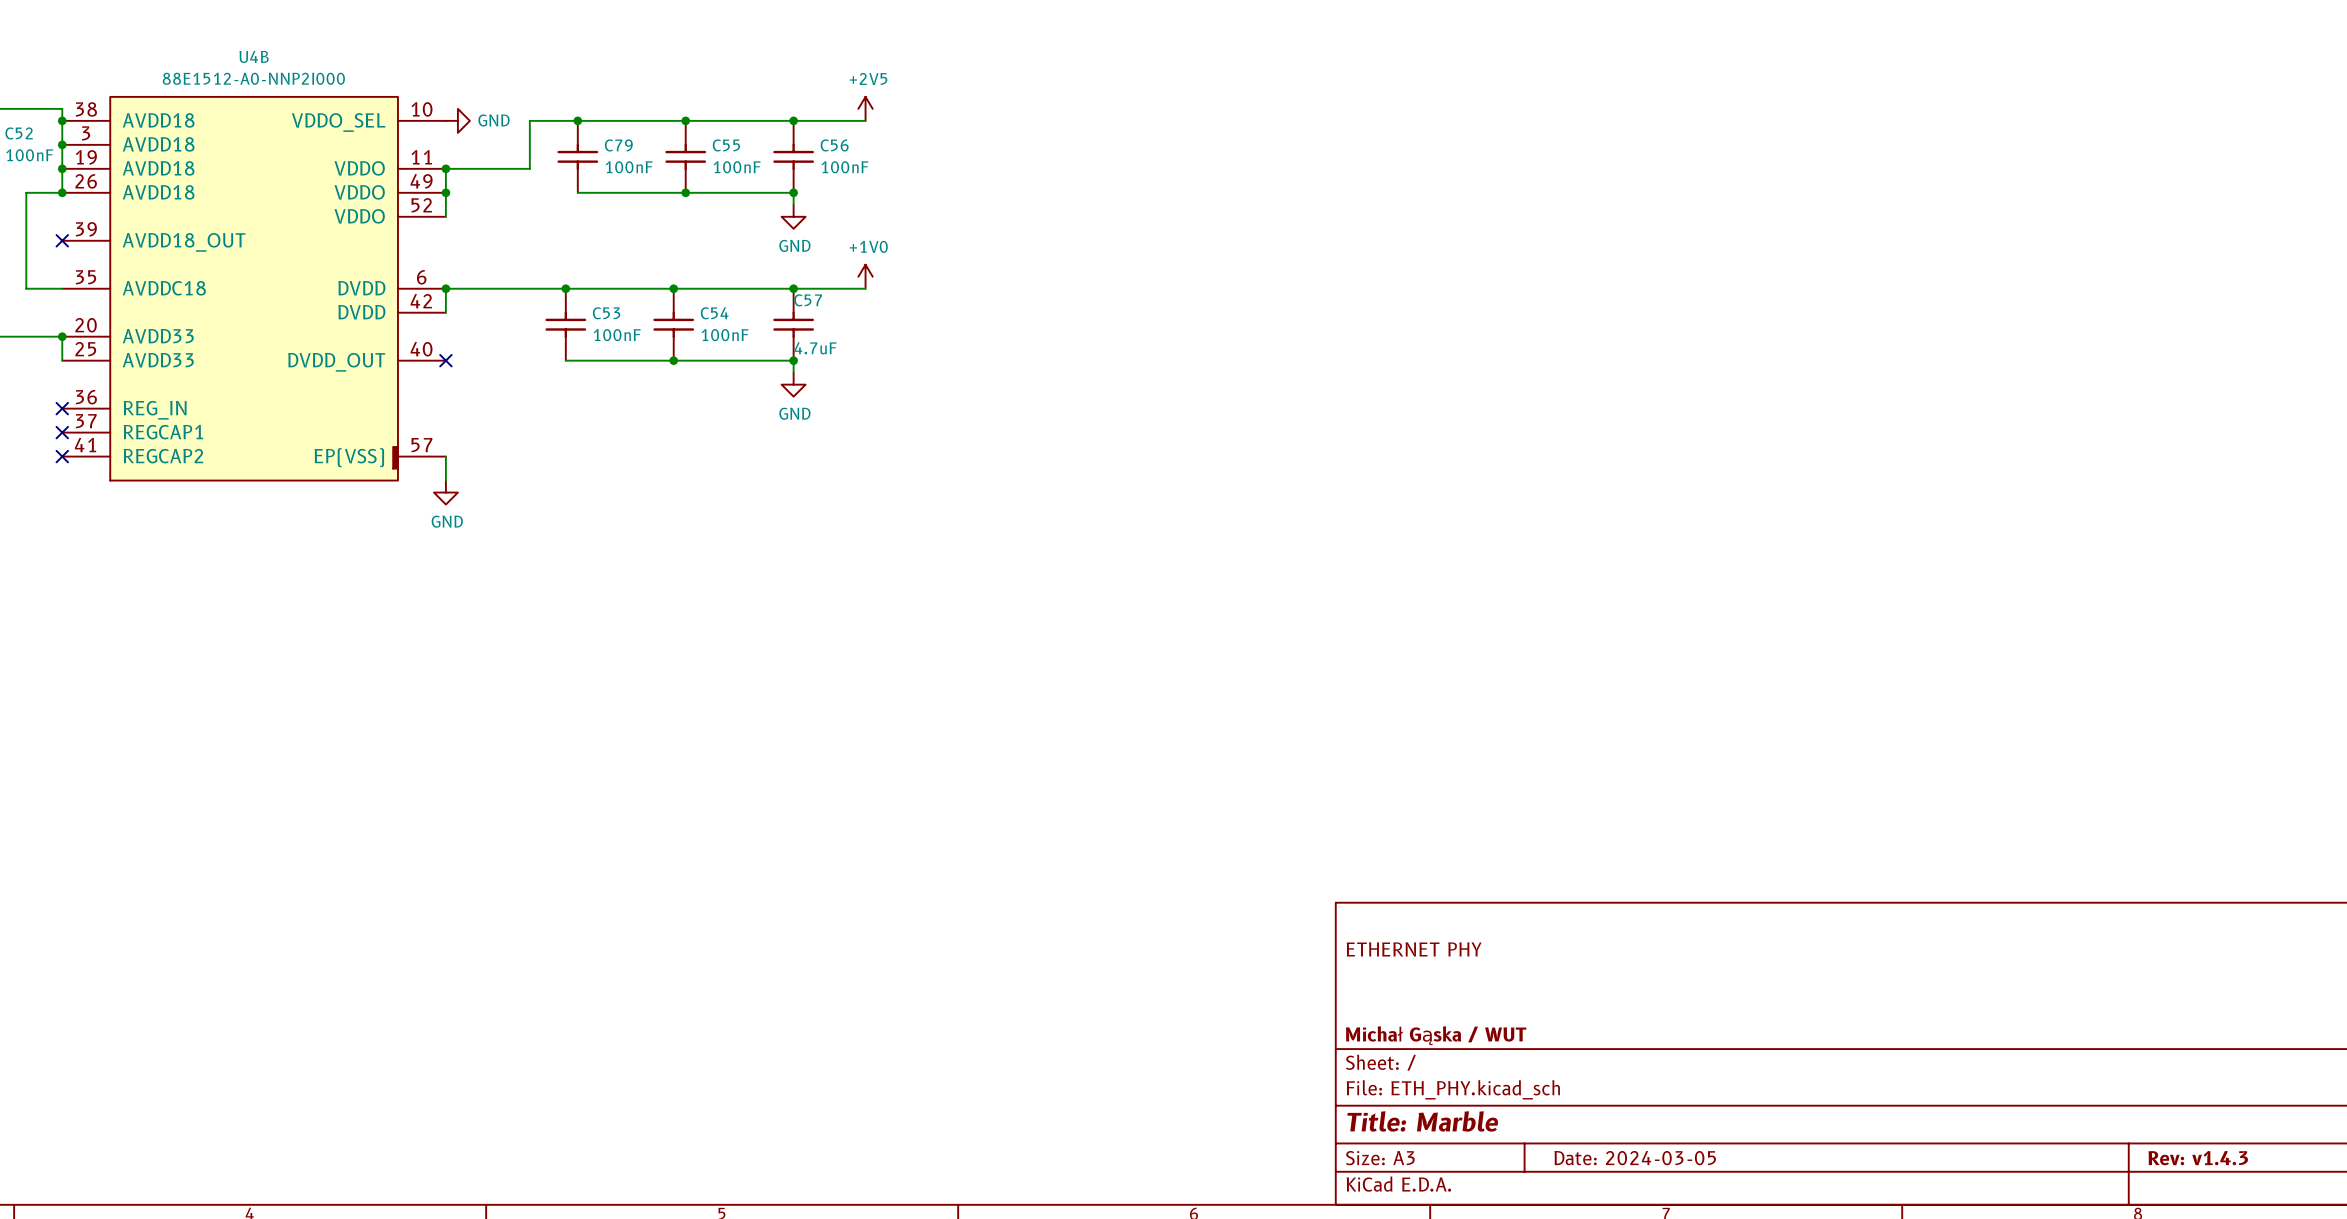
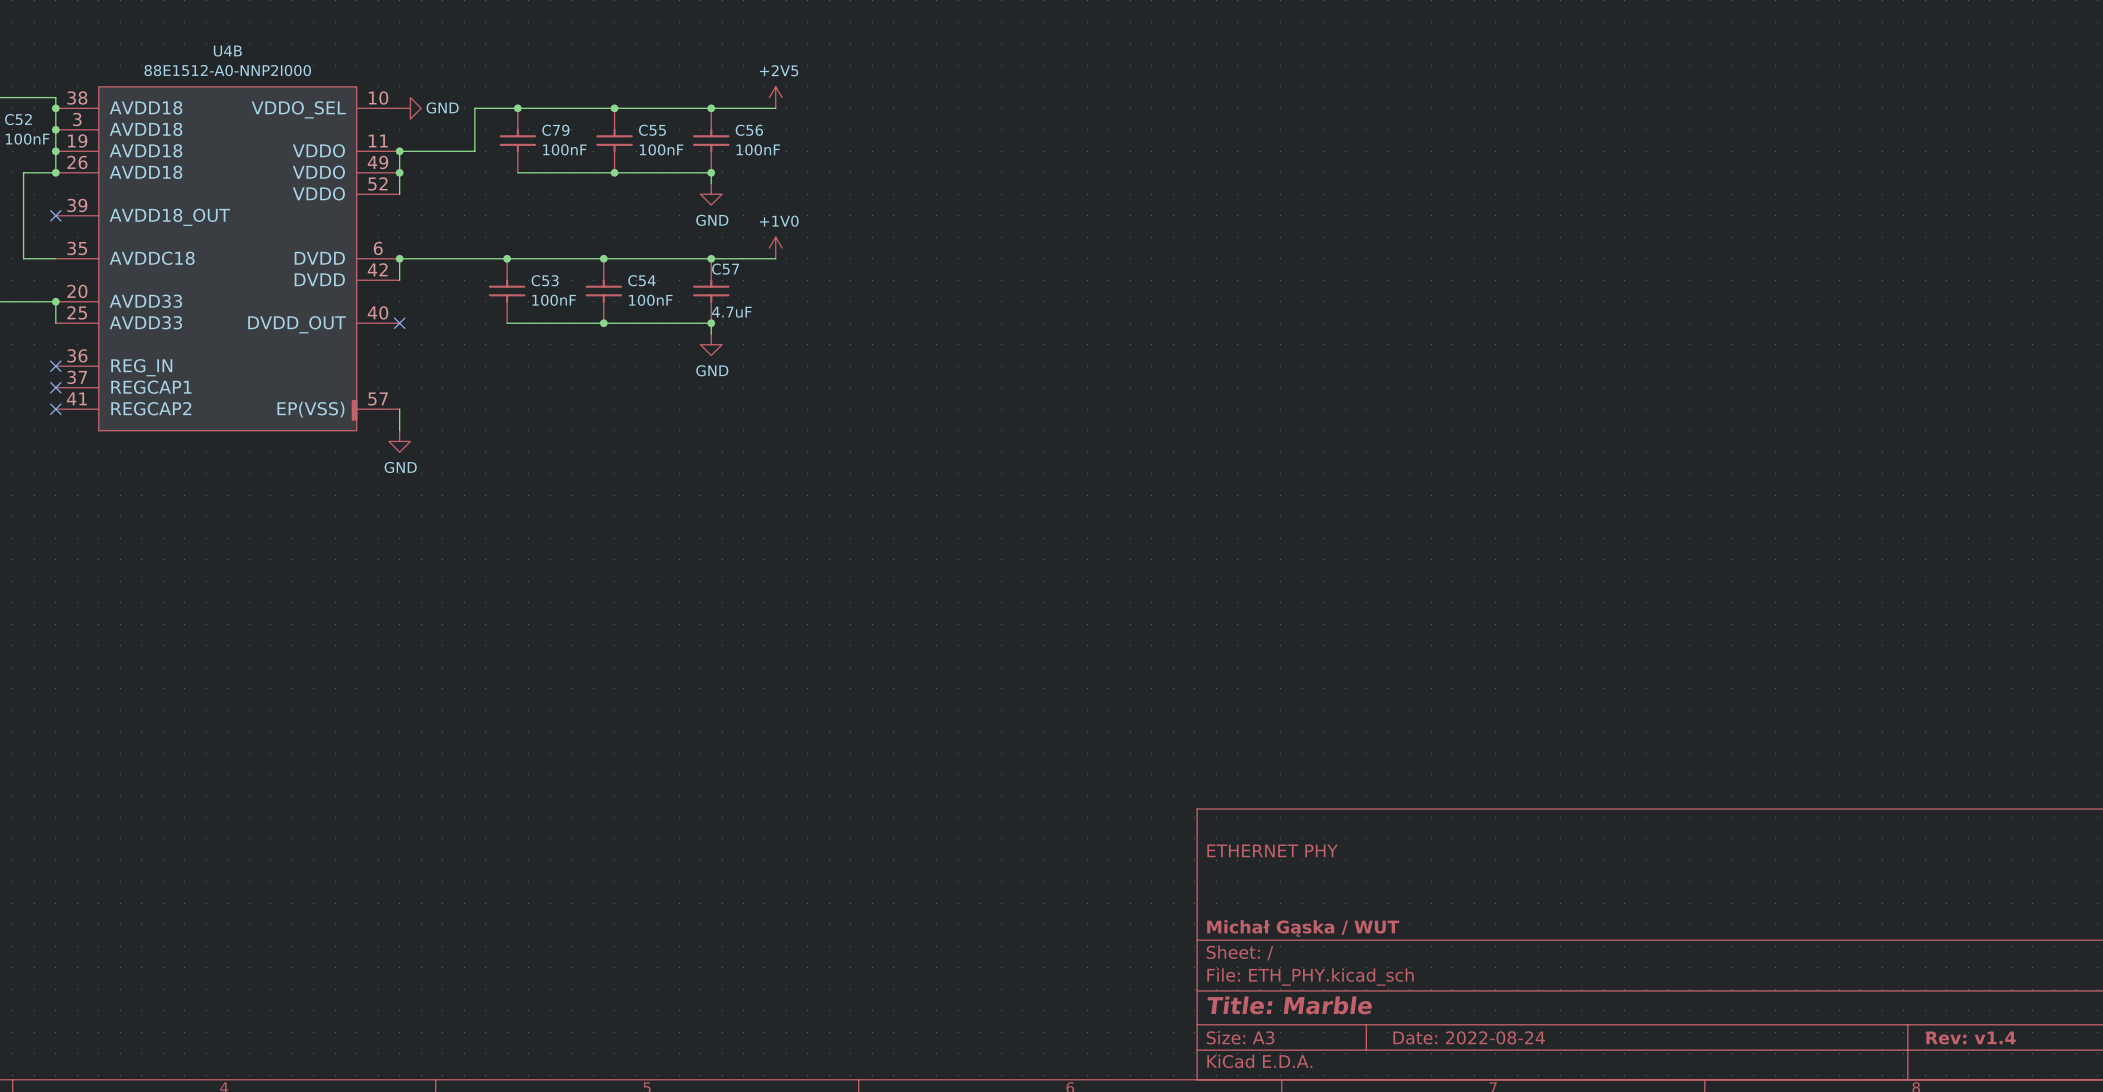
title block: Date: 2024-03-05 (1635, 1158) -> Date: 2022-08-24 (1469, 1037)
title block: Rev: v1.4.3 (2198, 1158) -> Rev: v1.4 (1971, 1037)

